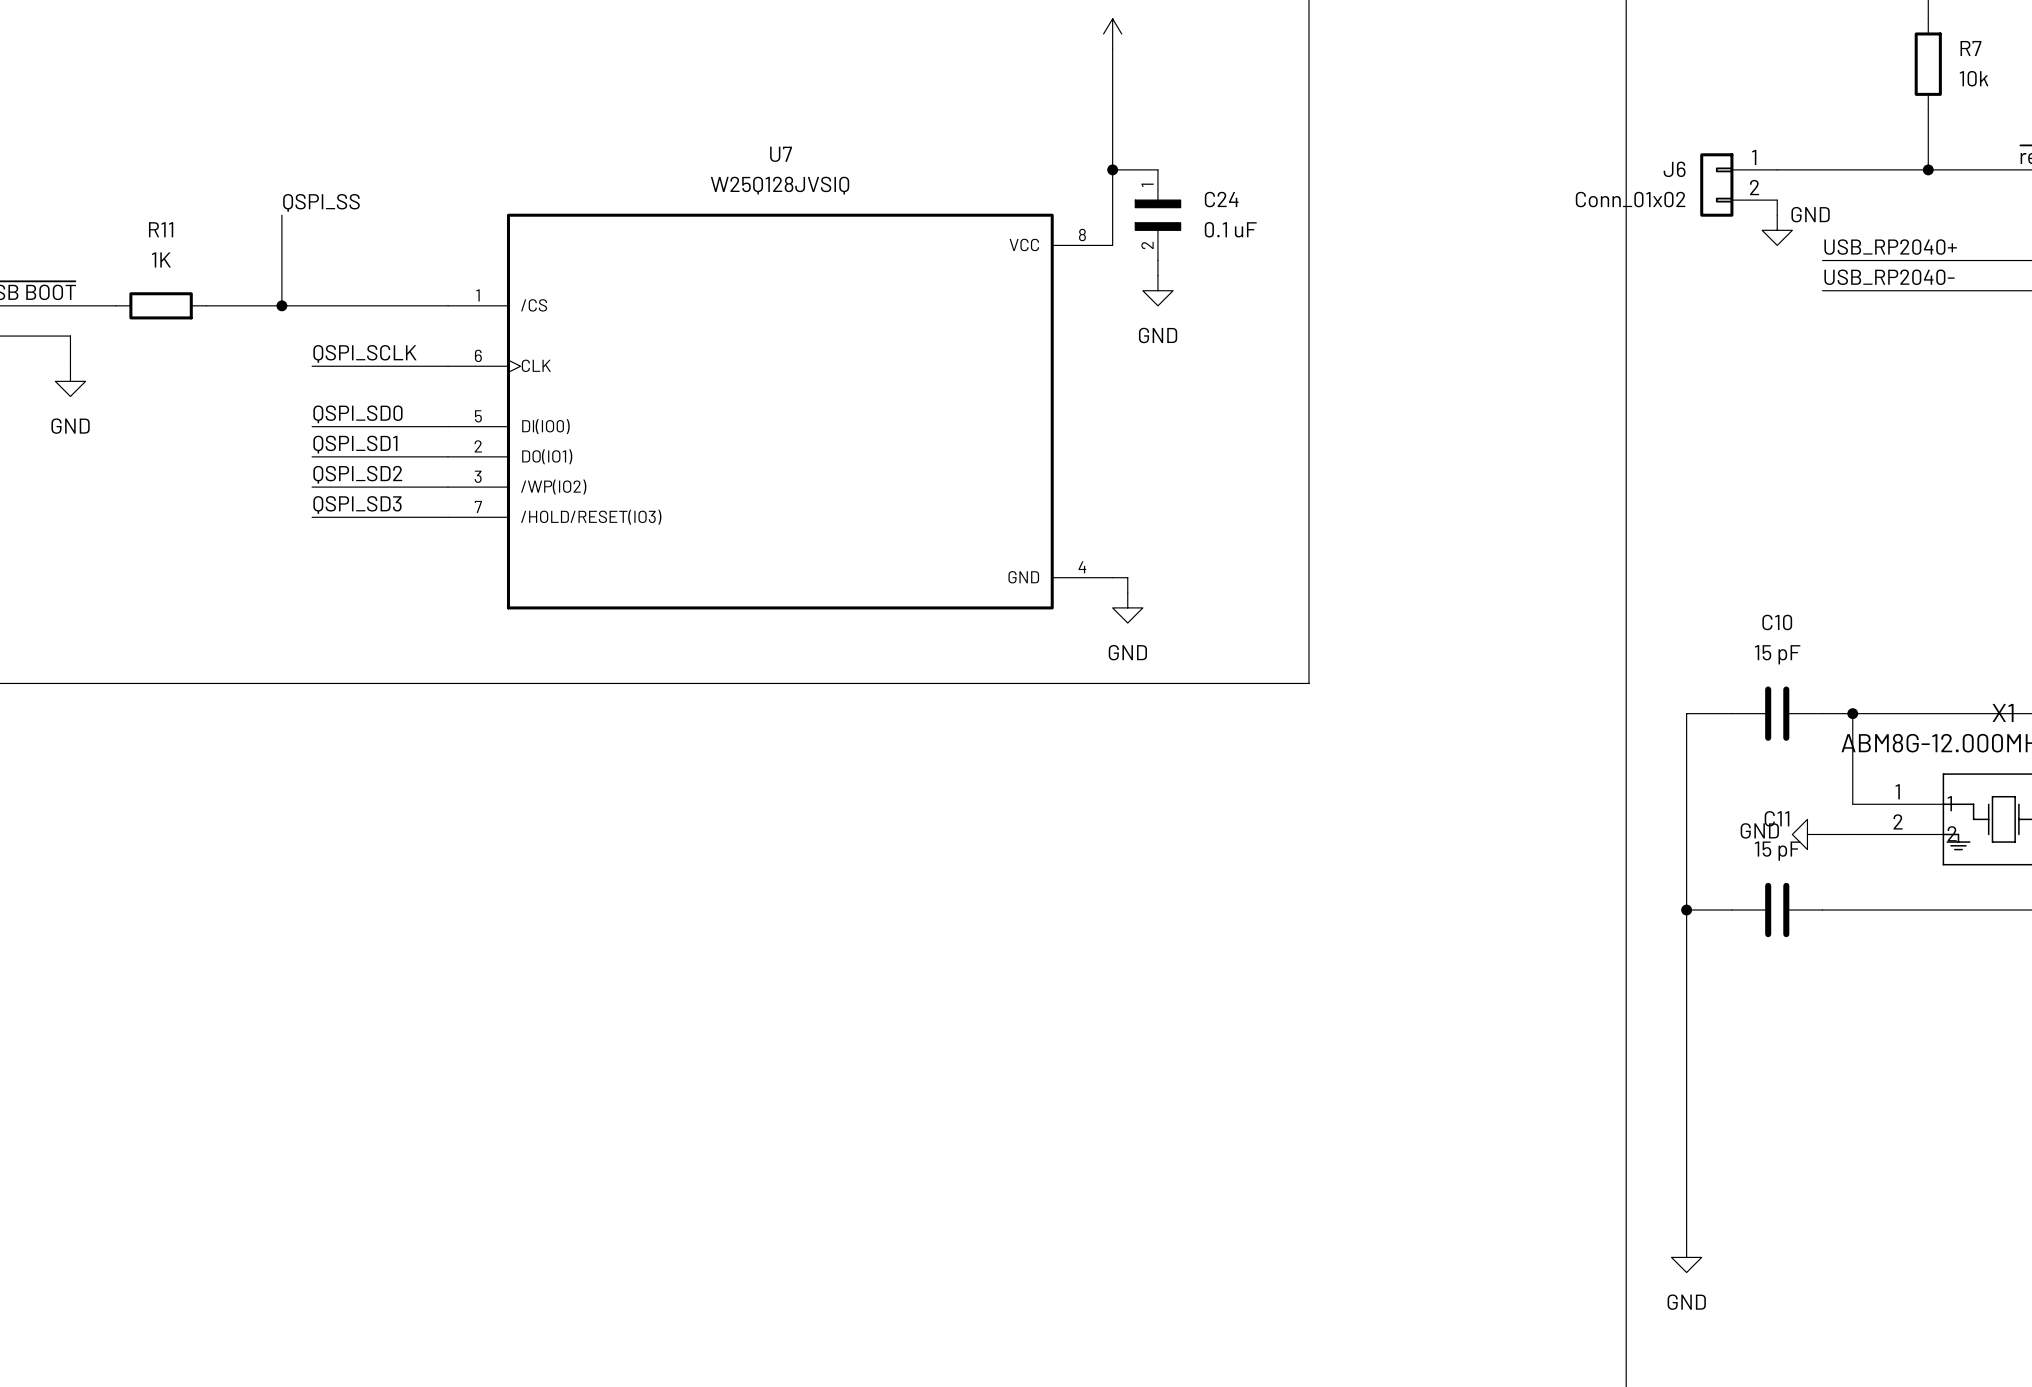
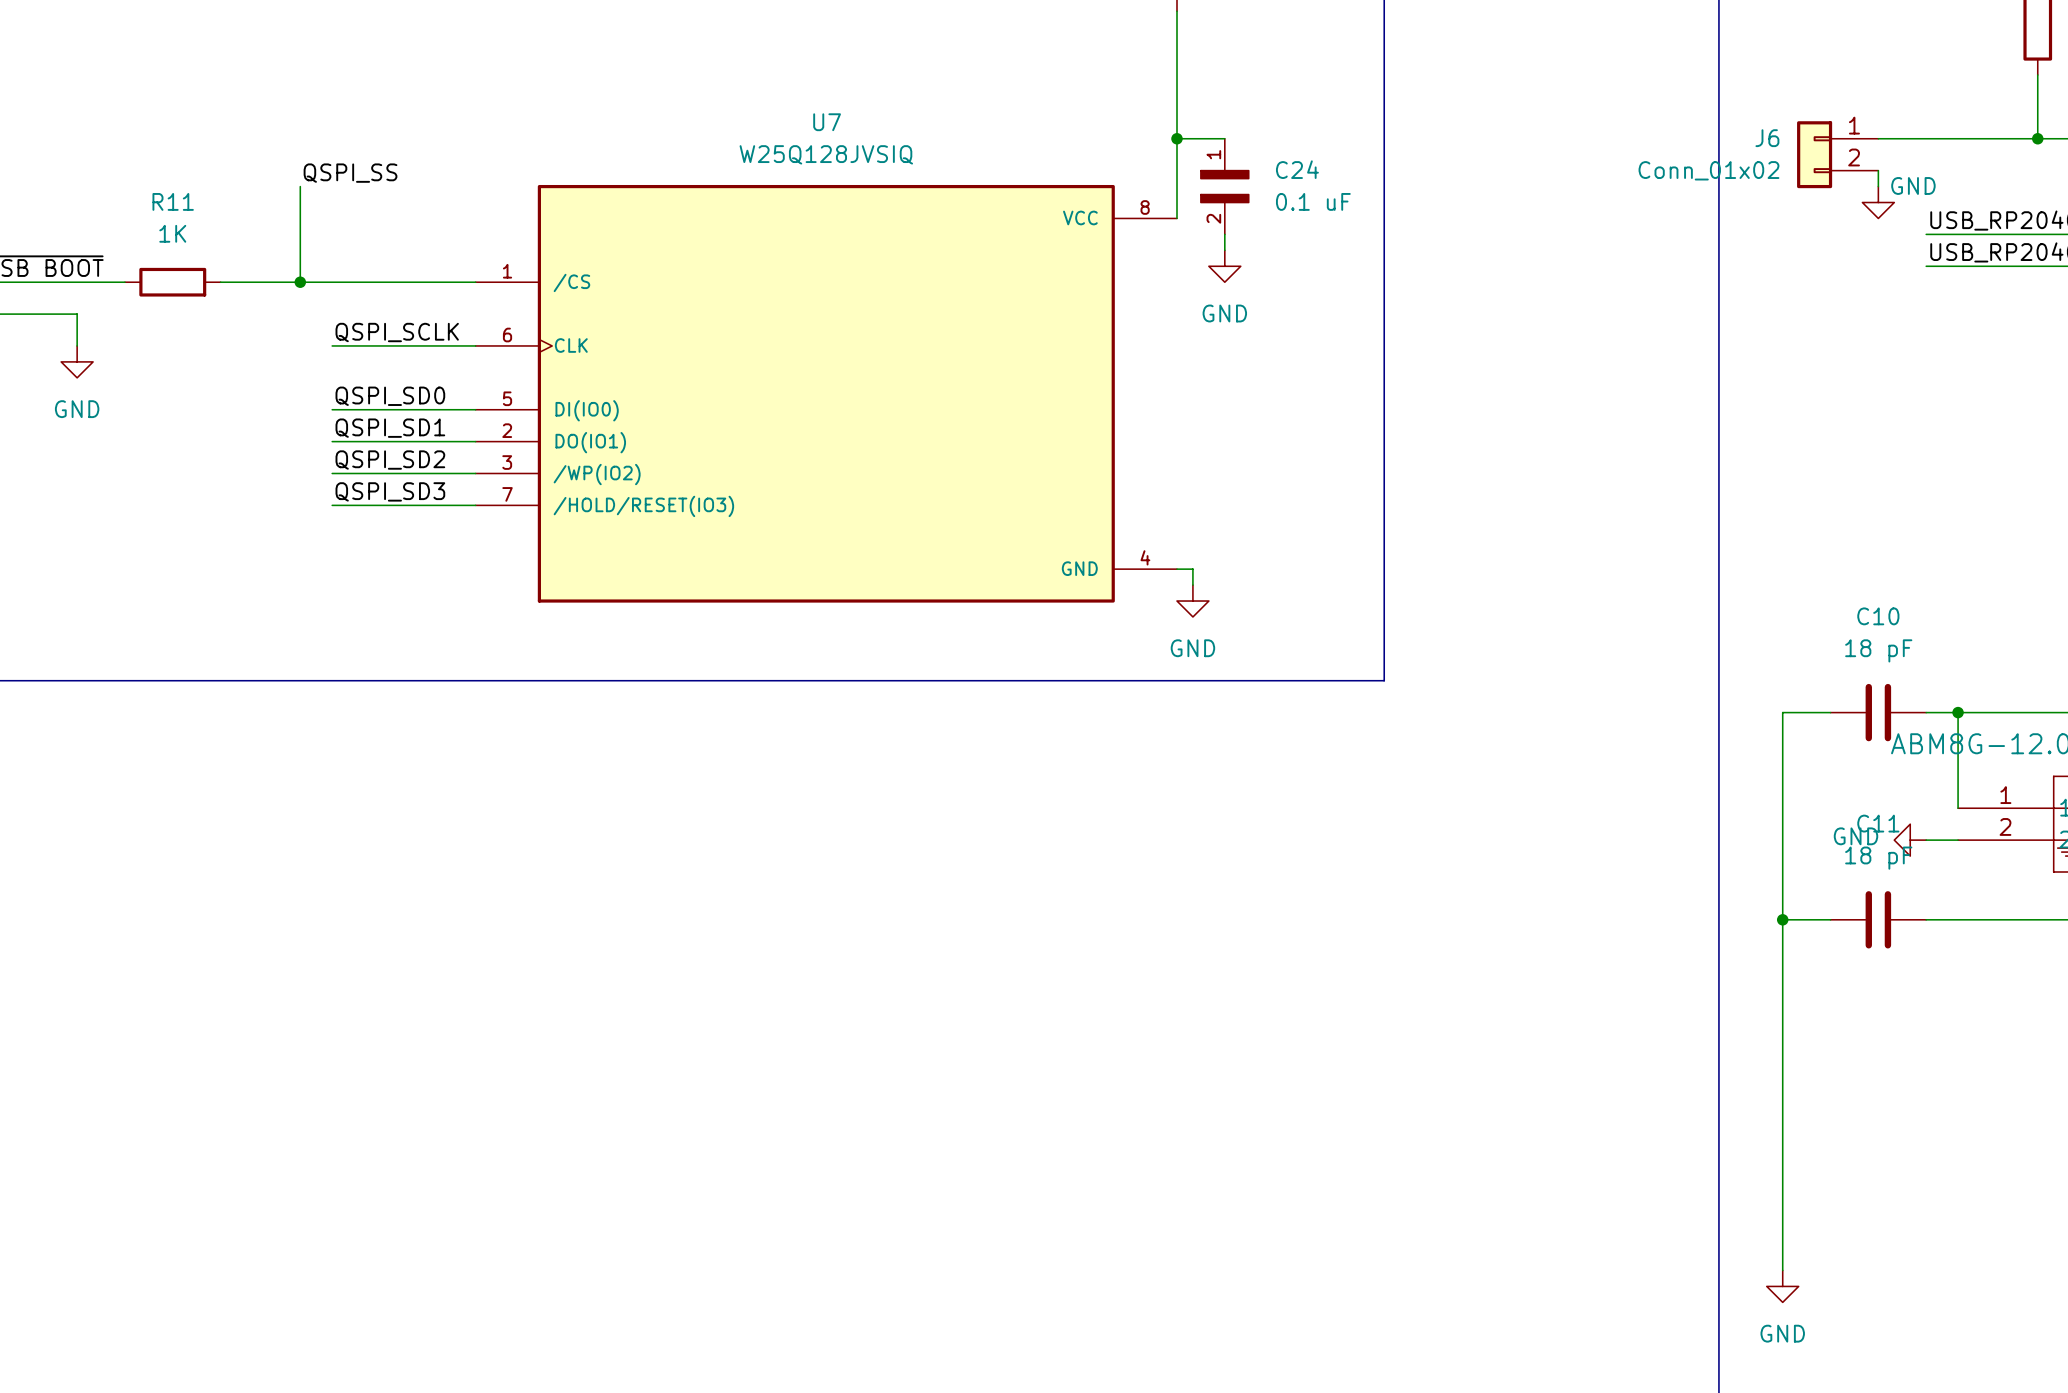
C10 value: 15 pF (1777, 654) -> 18 pF (1878, 650)
C11 value: 15 pF (1777, 851) -> 18 pF (1878, 858)

